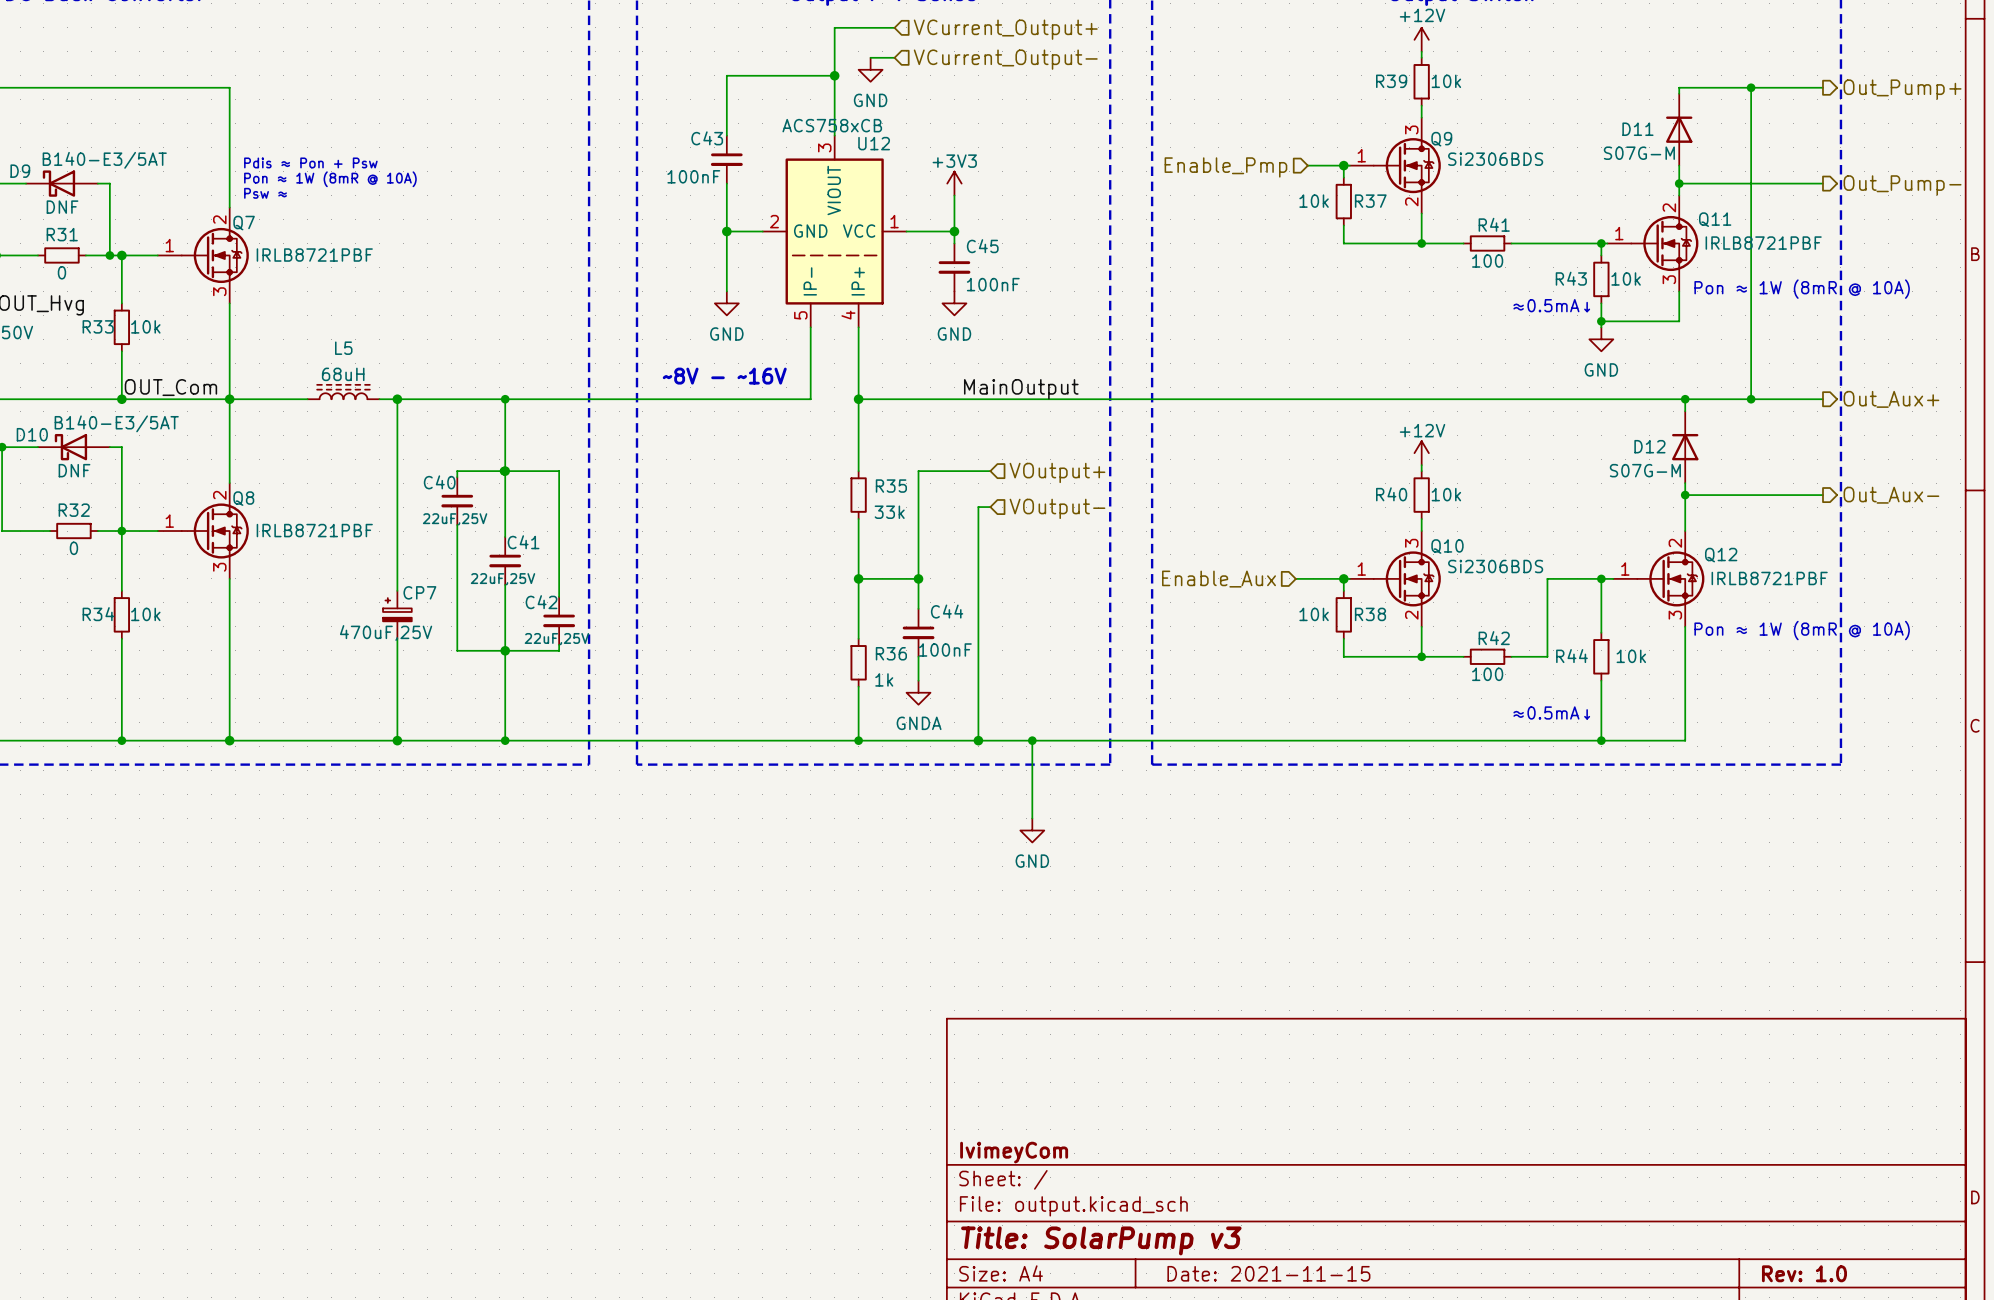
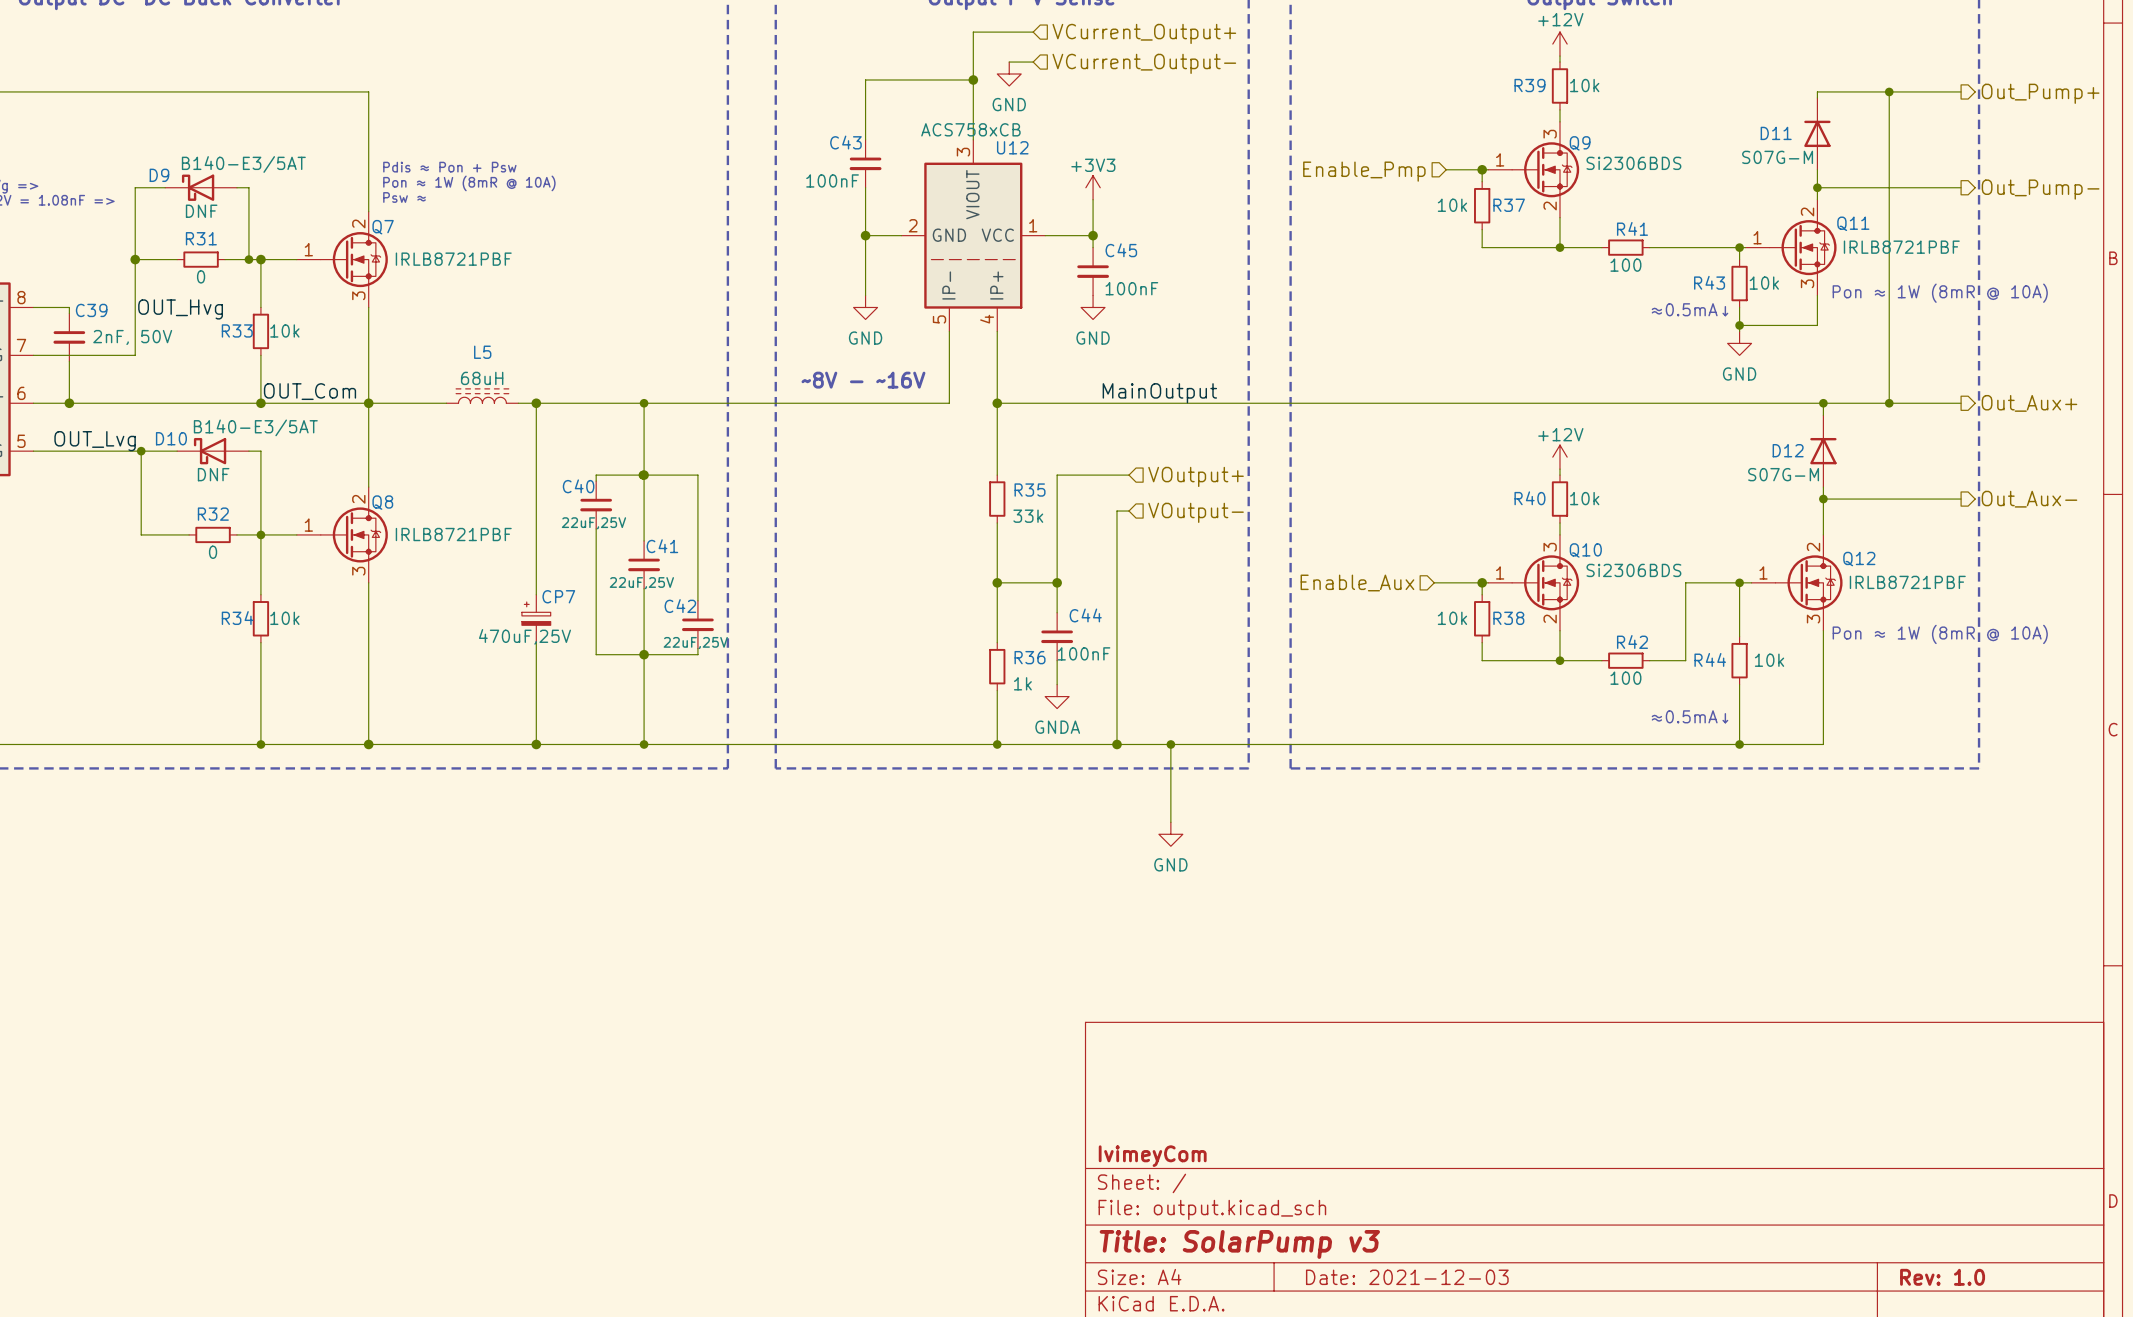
title block: Date: 2021-11-15 (1268, 1273) -> Date: 2021-12-03 (1407, 1277)

